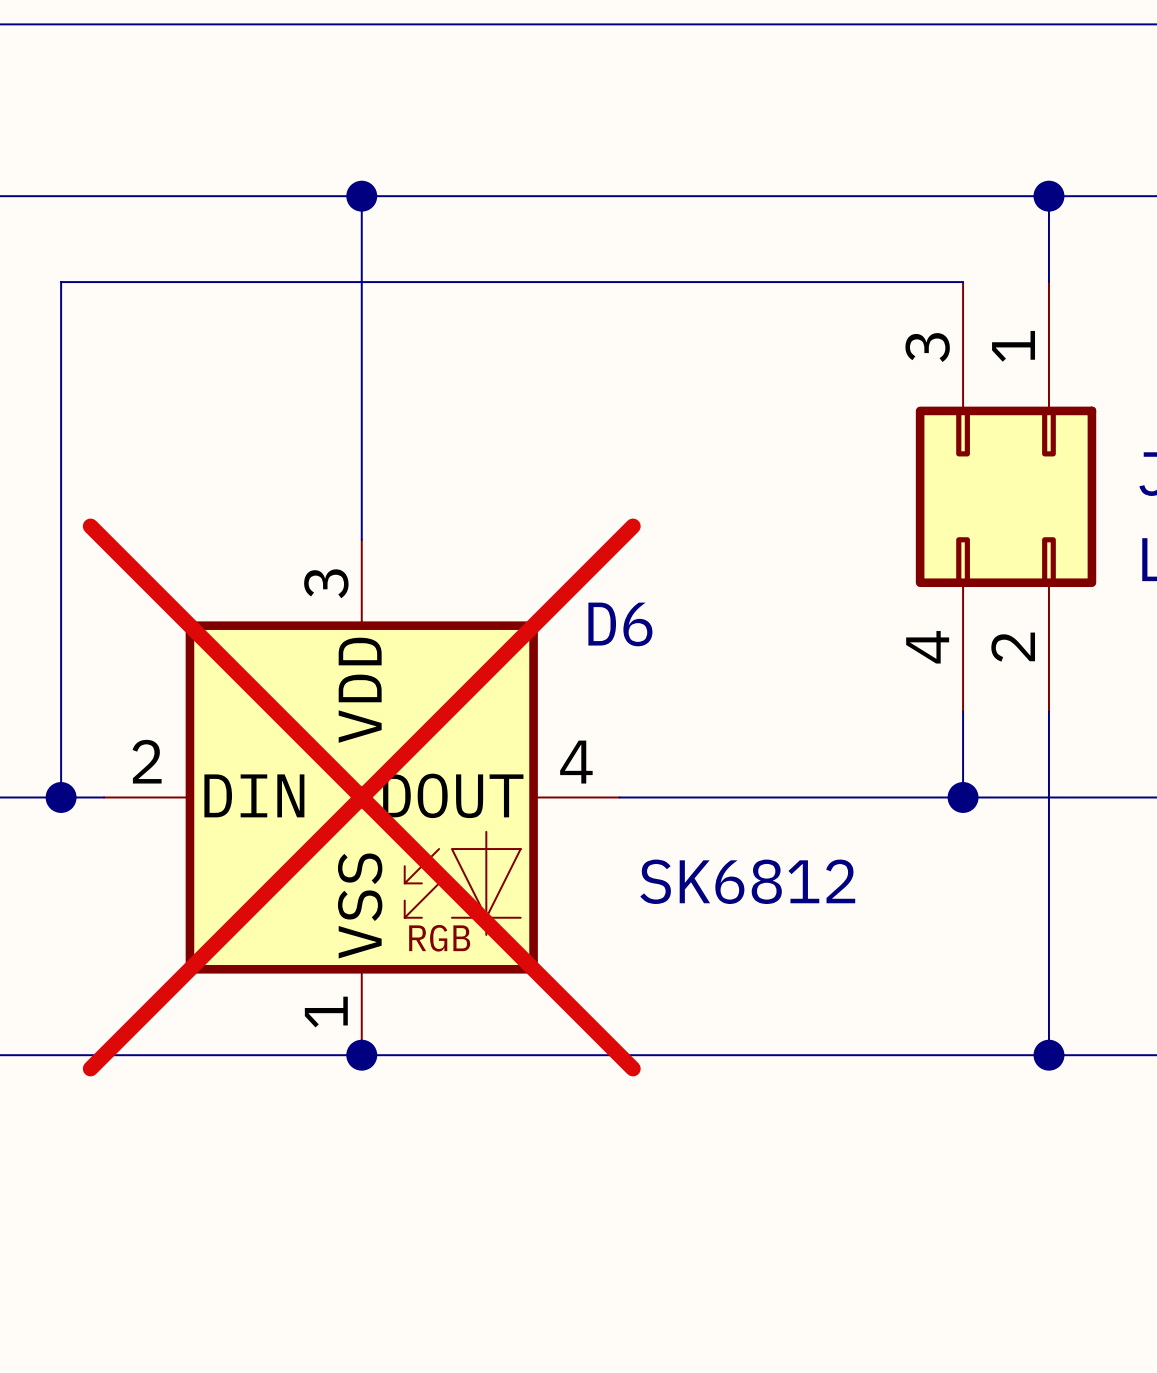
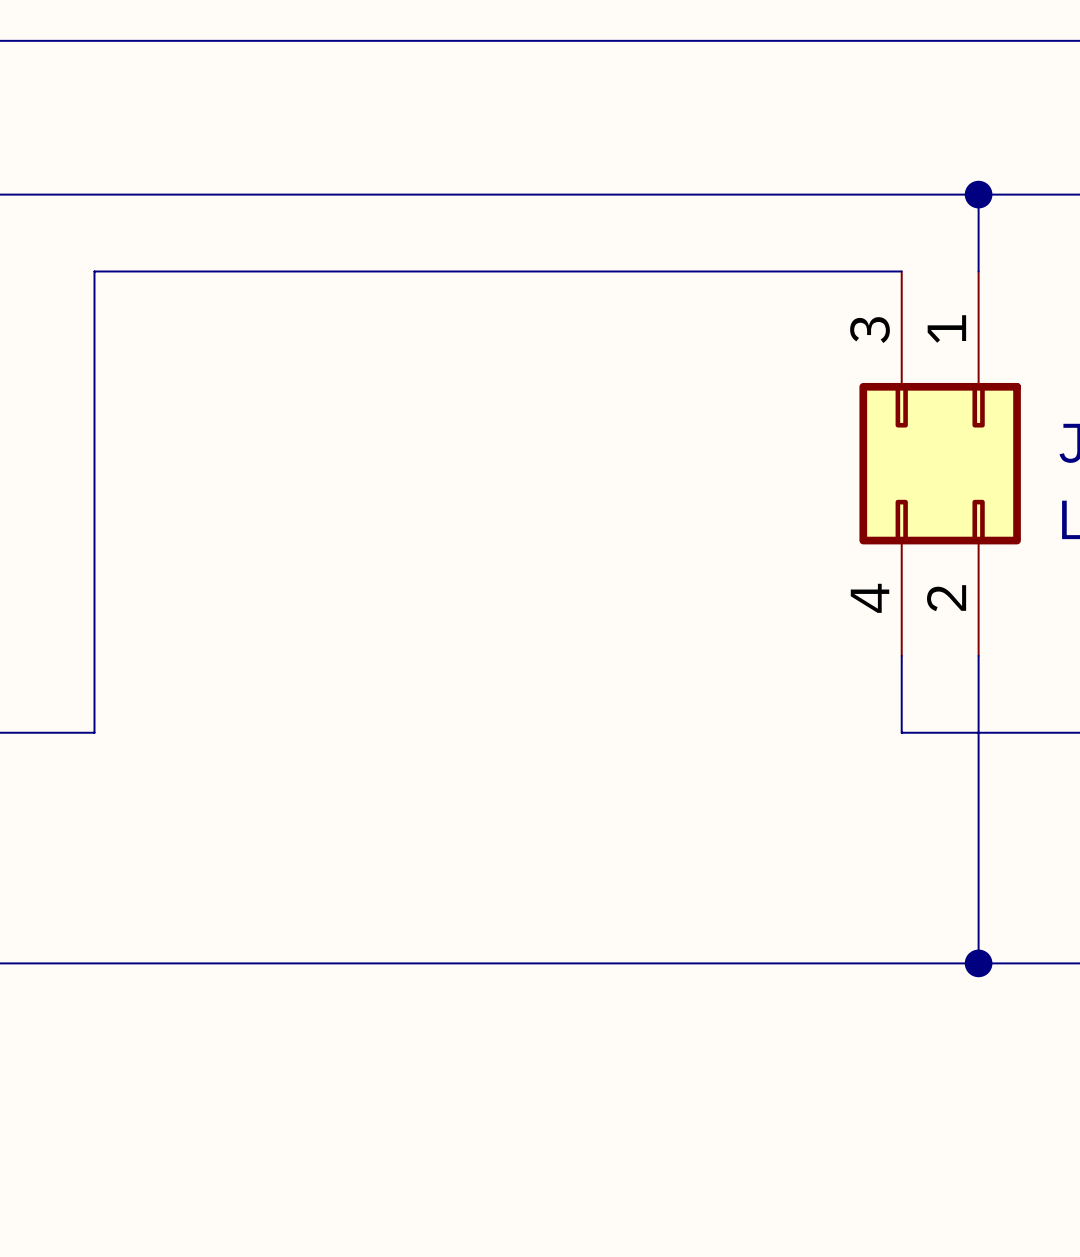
wire: (361, 196) (361, 539) -> none
junction: (361, 196) -> none
wire: (61, 797) (104, 797) -> none
junction: (61, 797) -> none
D6: SK6812 (361, 797) -> none
wire: (619, 797) (963, 797) -> none
junction: (963, 797) -> none
junction: (361, 1055) -> none

